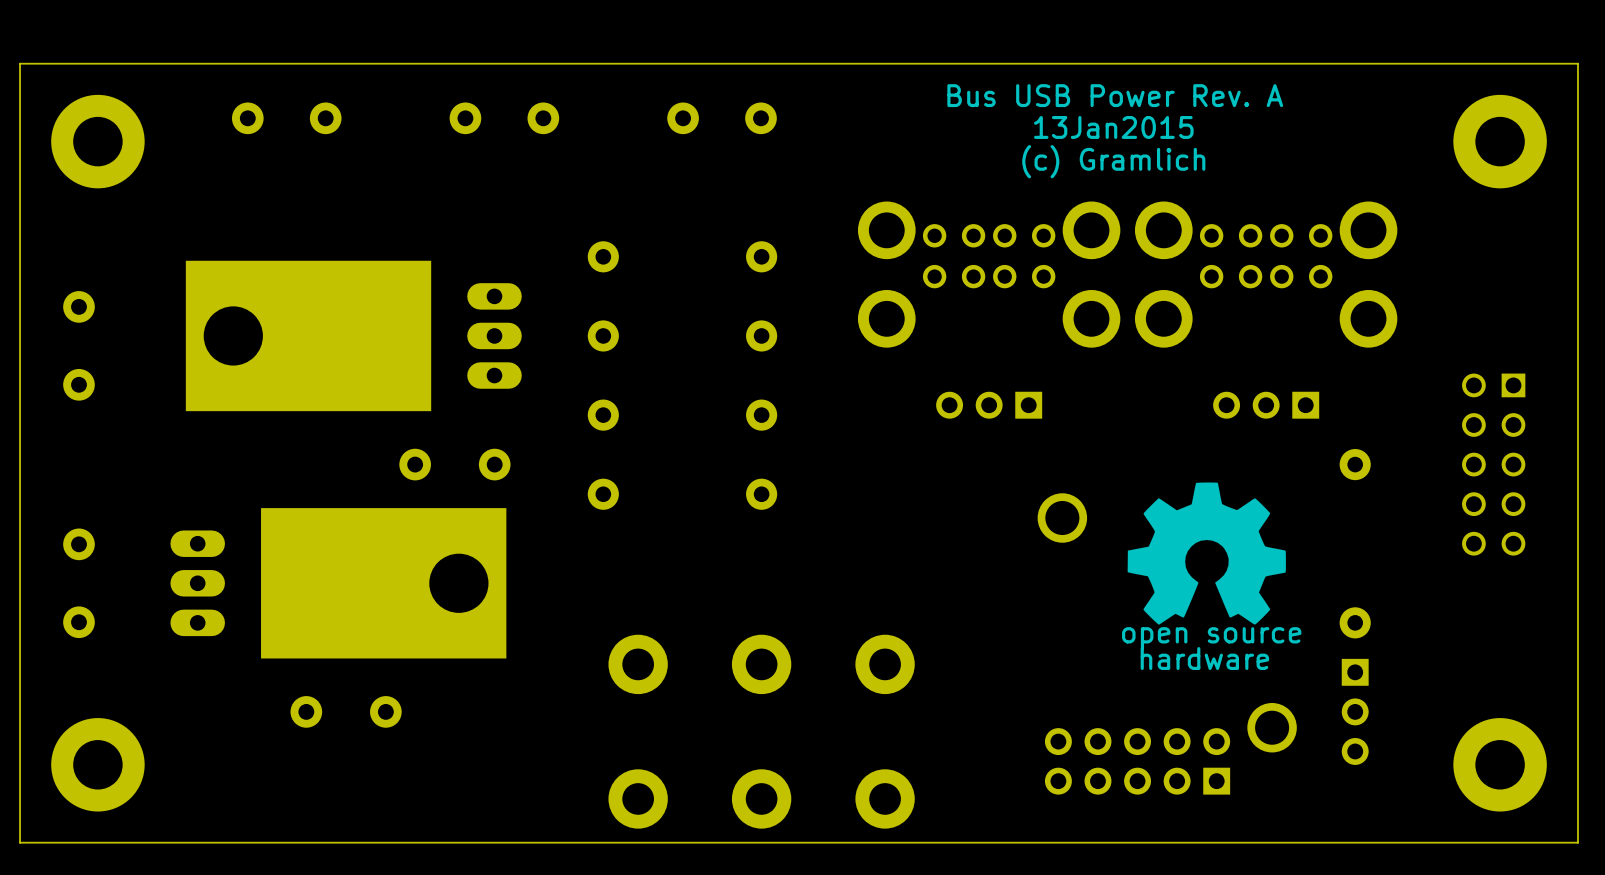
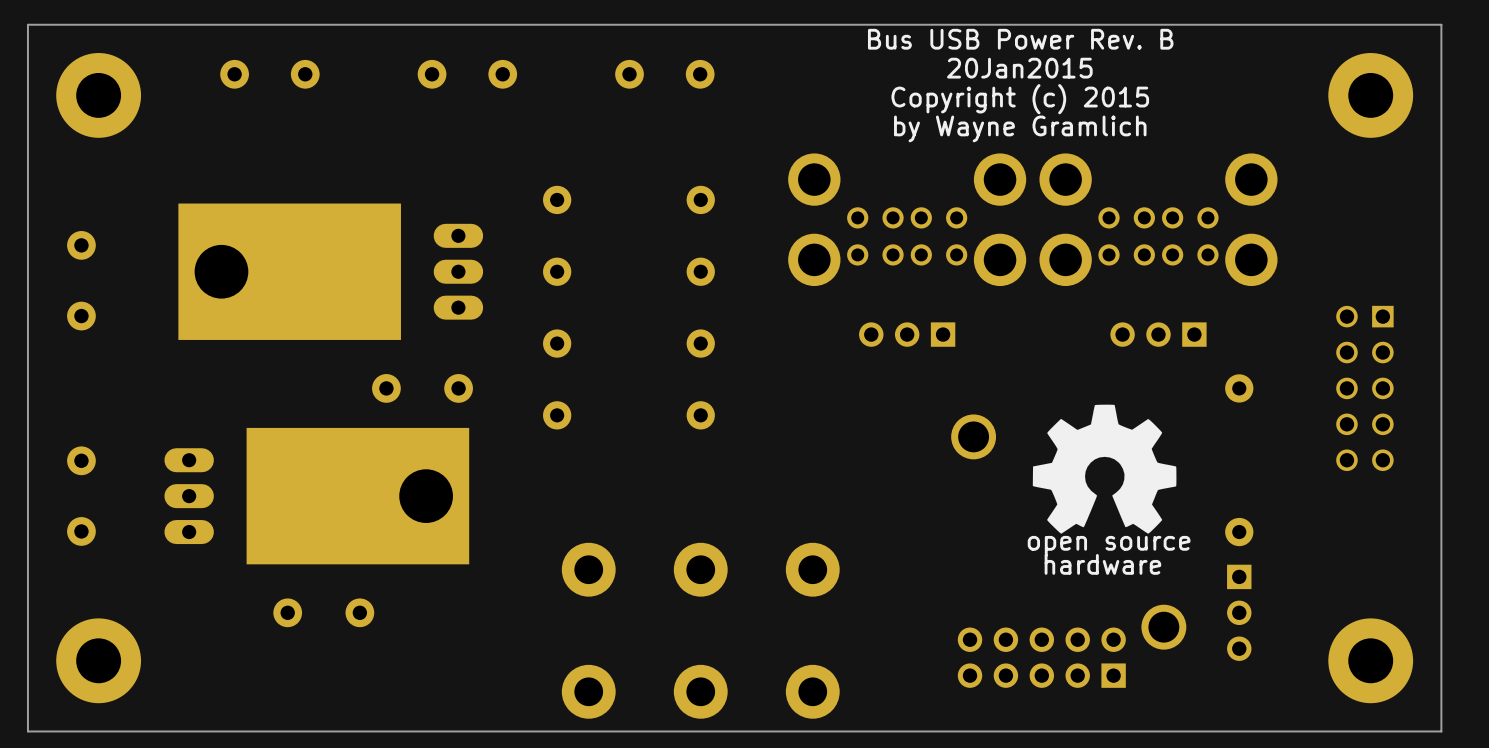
text: Bus USB Power Rev. A (1115, 95) -> Bus USB Power Rev. B (1020, 39)
text: 13Jan2015 (1113, 127) -> 20Jan2015 (1019, 68)
text: none -> Copyright (c) 2015 (1020, 99)
text: (c) Gramlich (1113, 161) -> by Wayne Gramlich (1020, 128)
part rotation: 0° (989, 274) -> 180° (907, 219)
part rotation: 0° (1266, 274) -> 180° (1158, 219)

